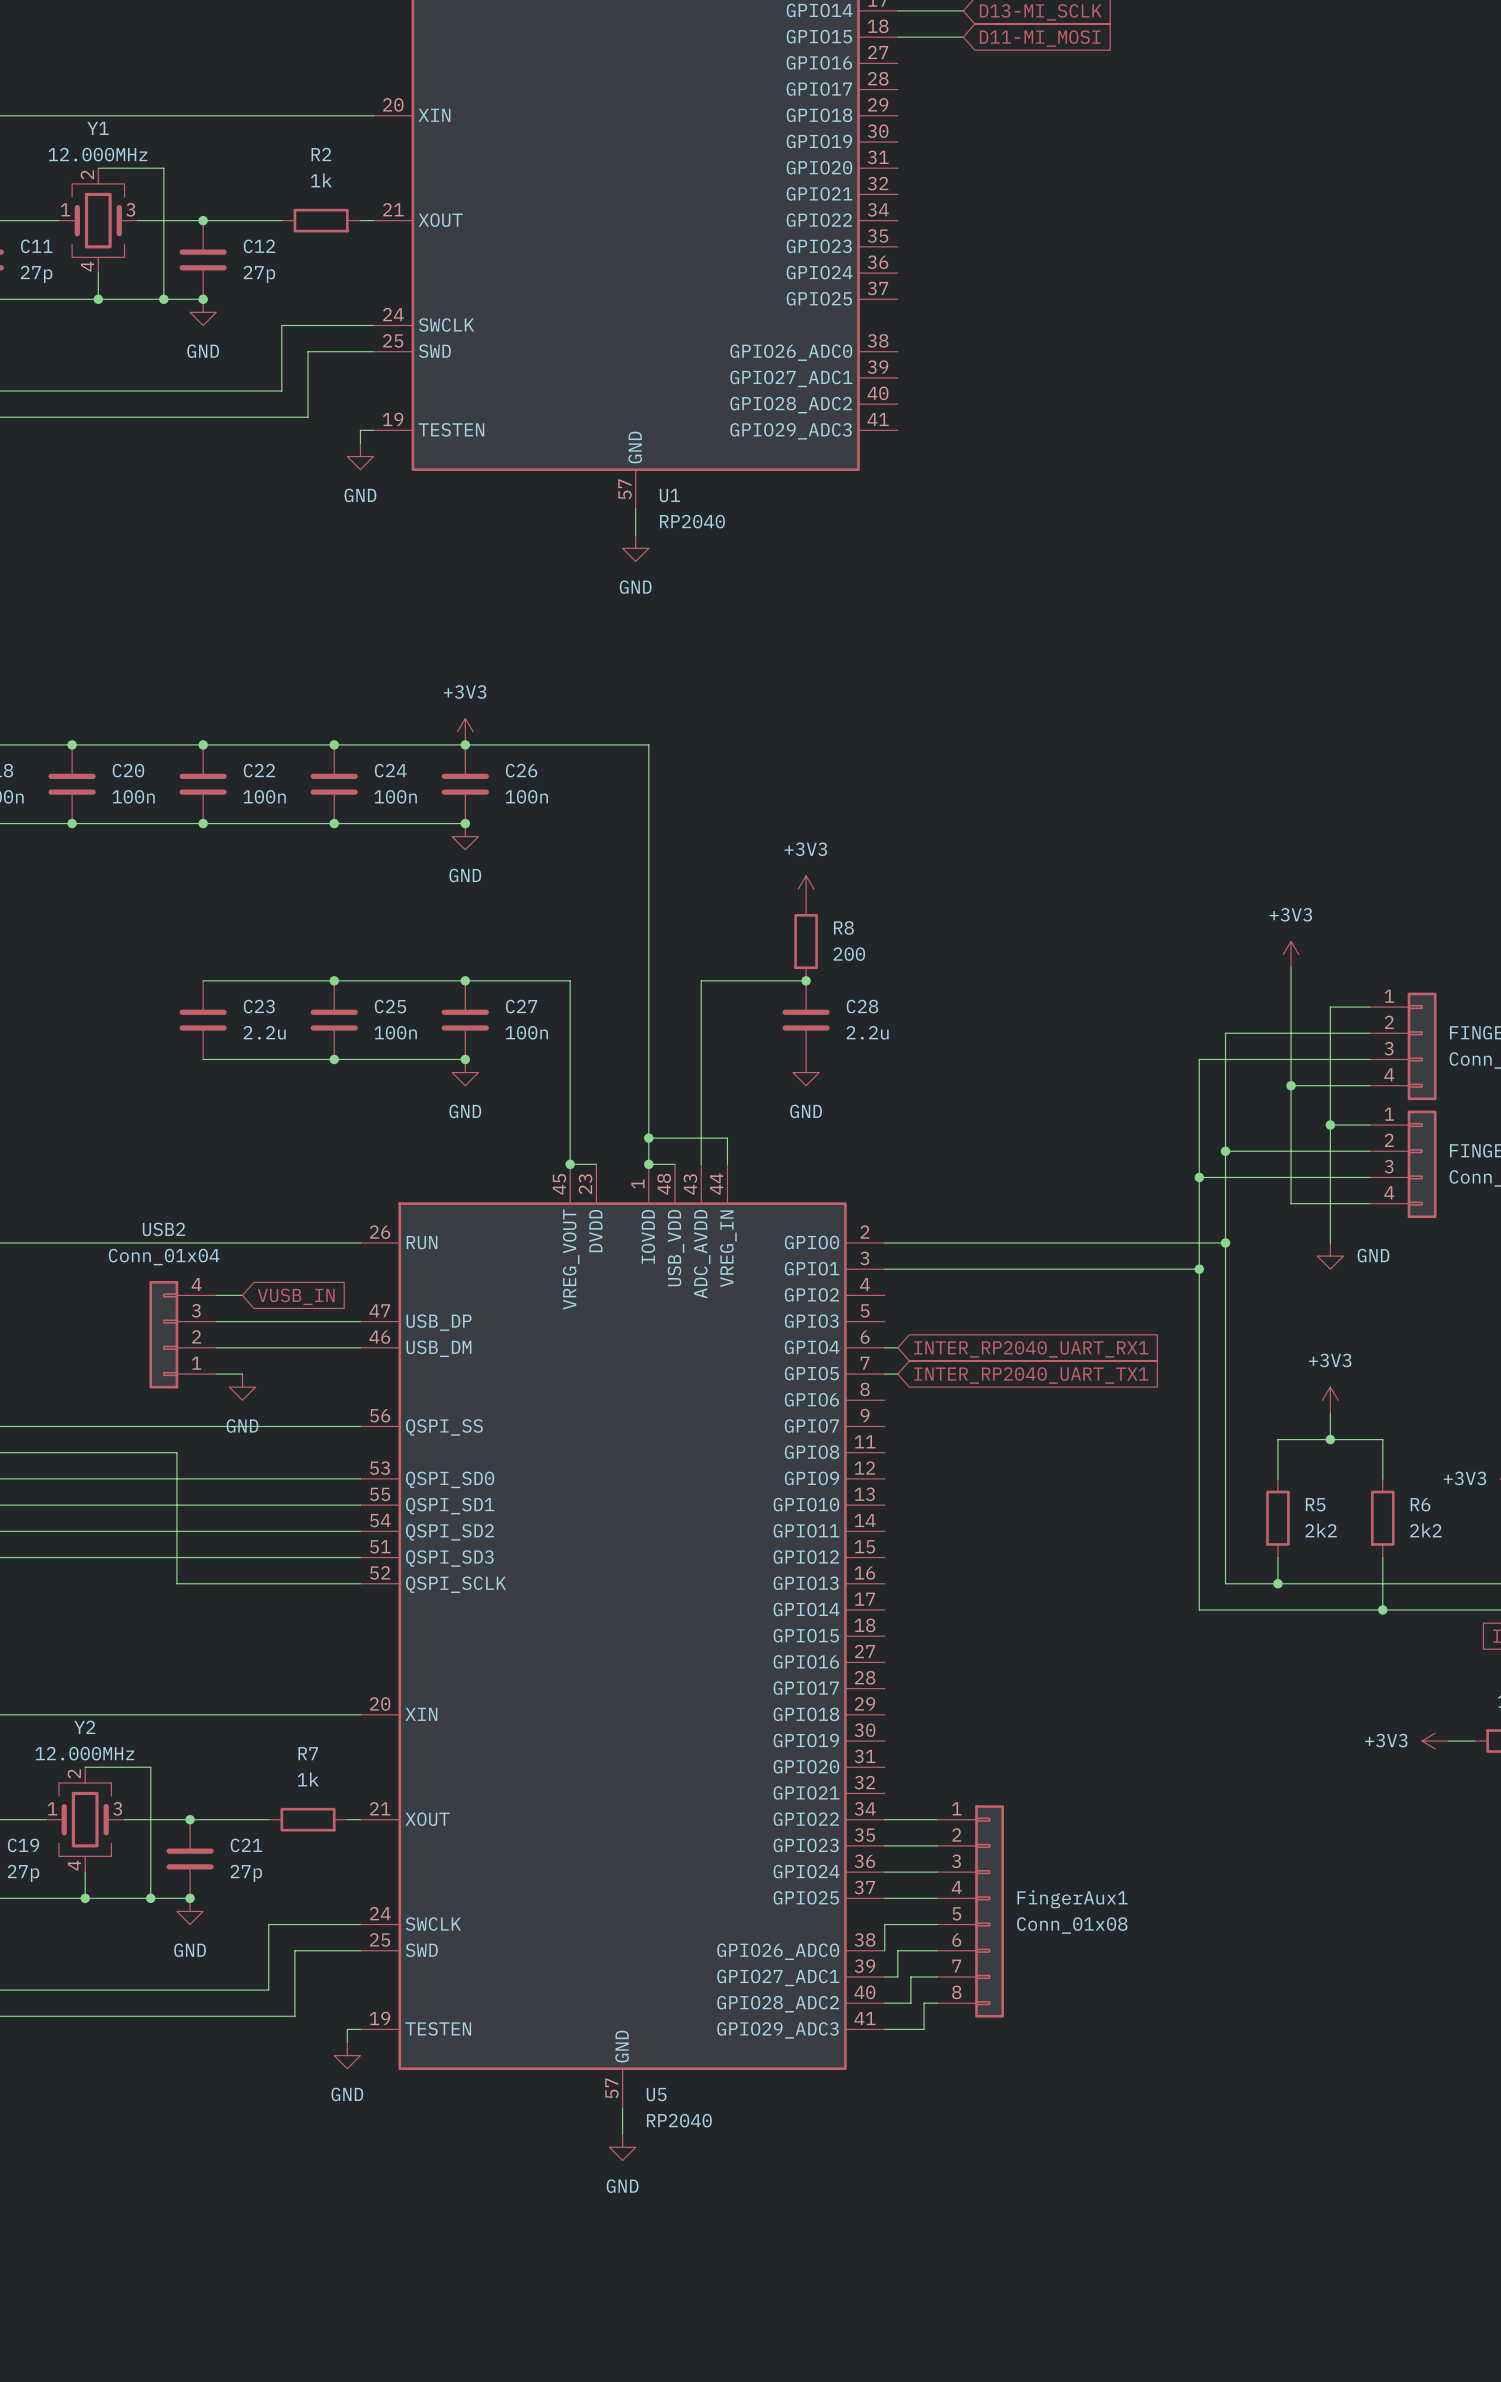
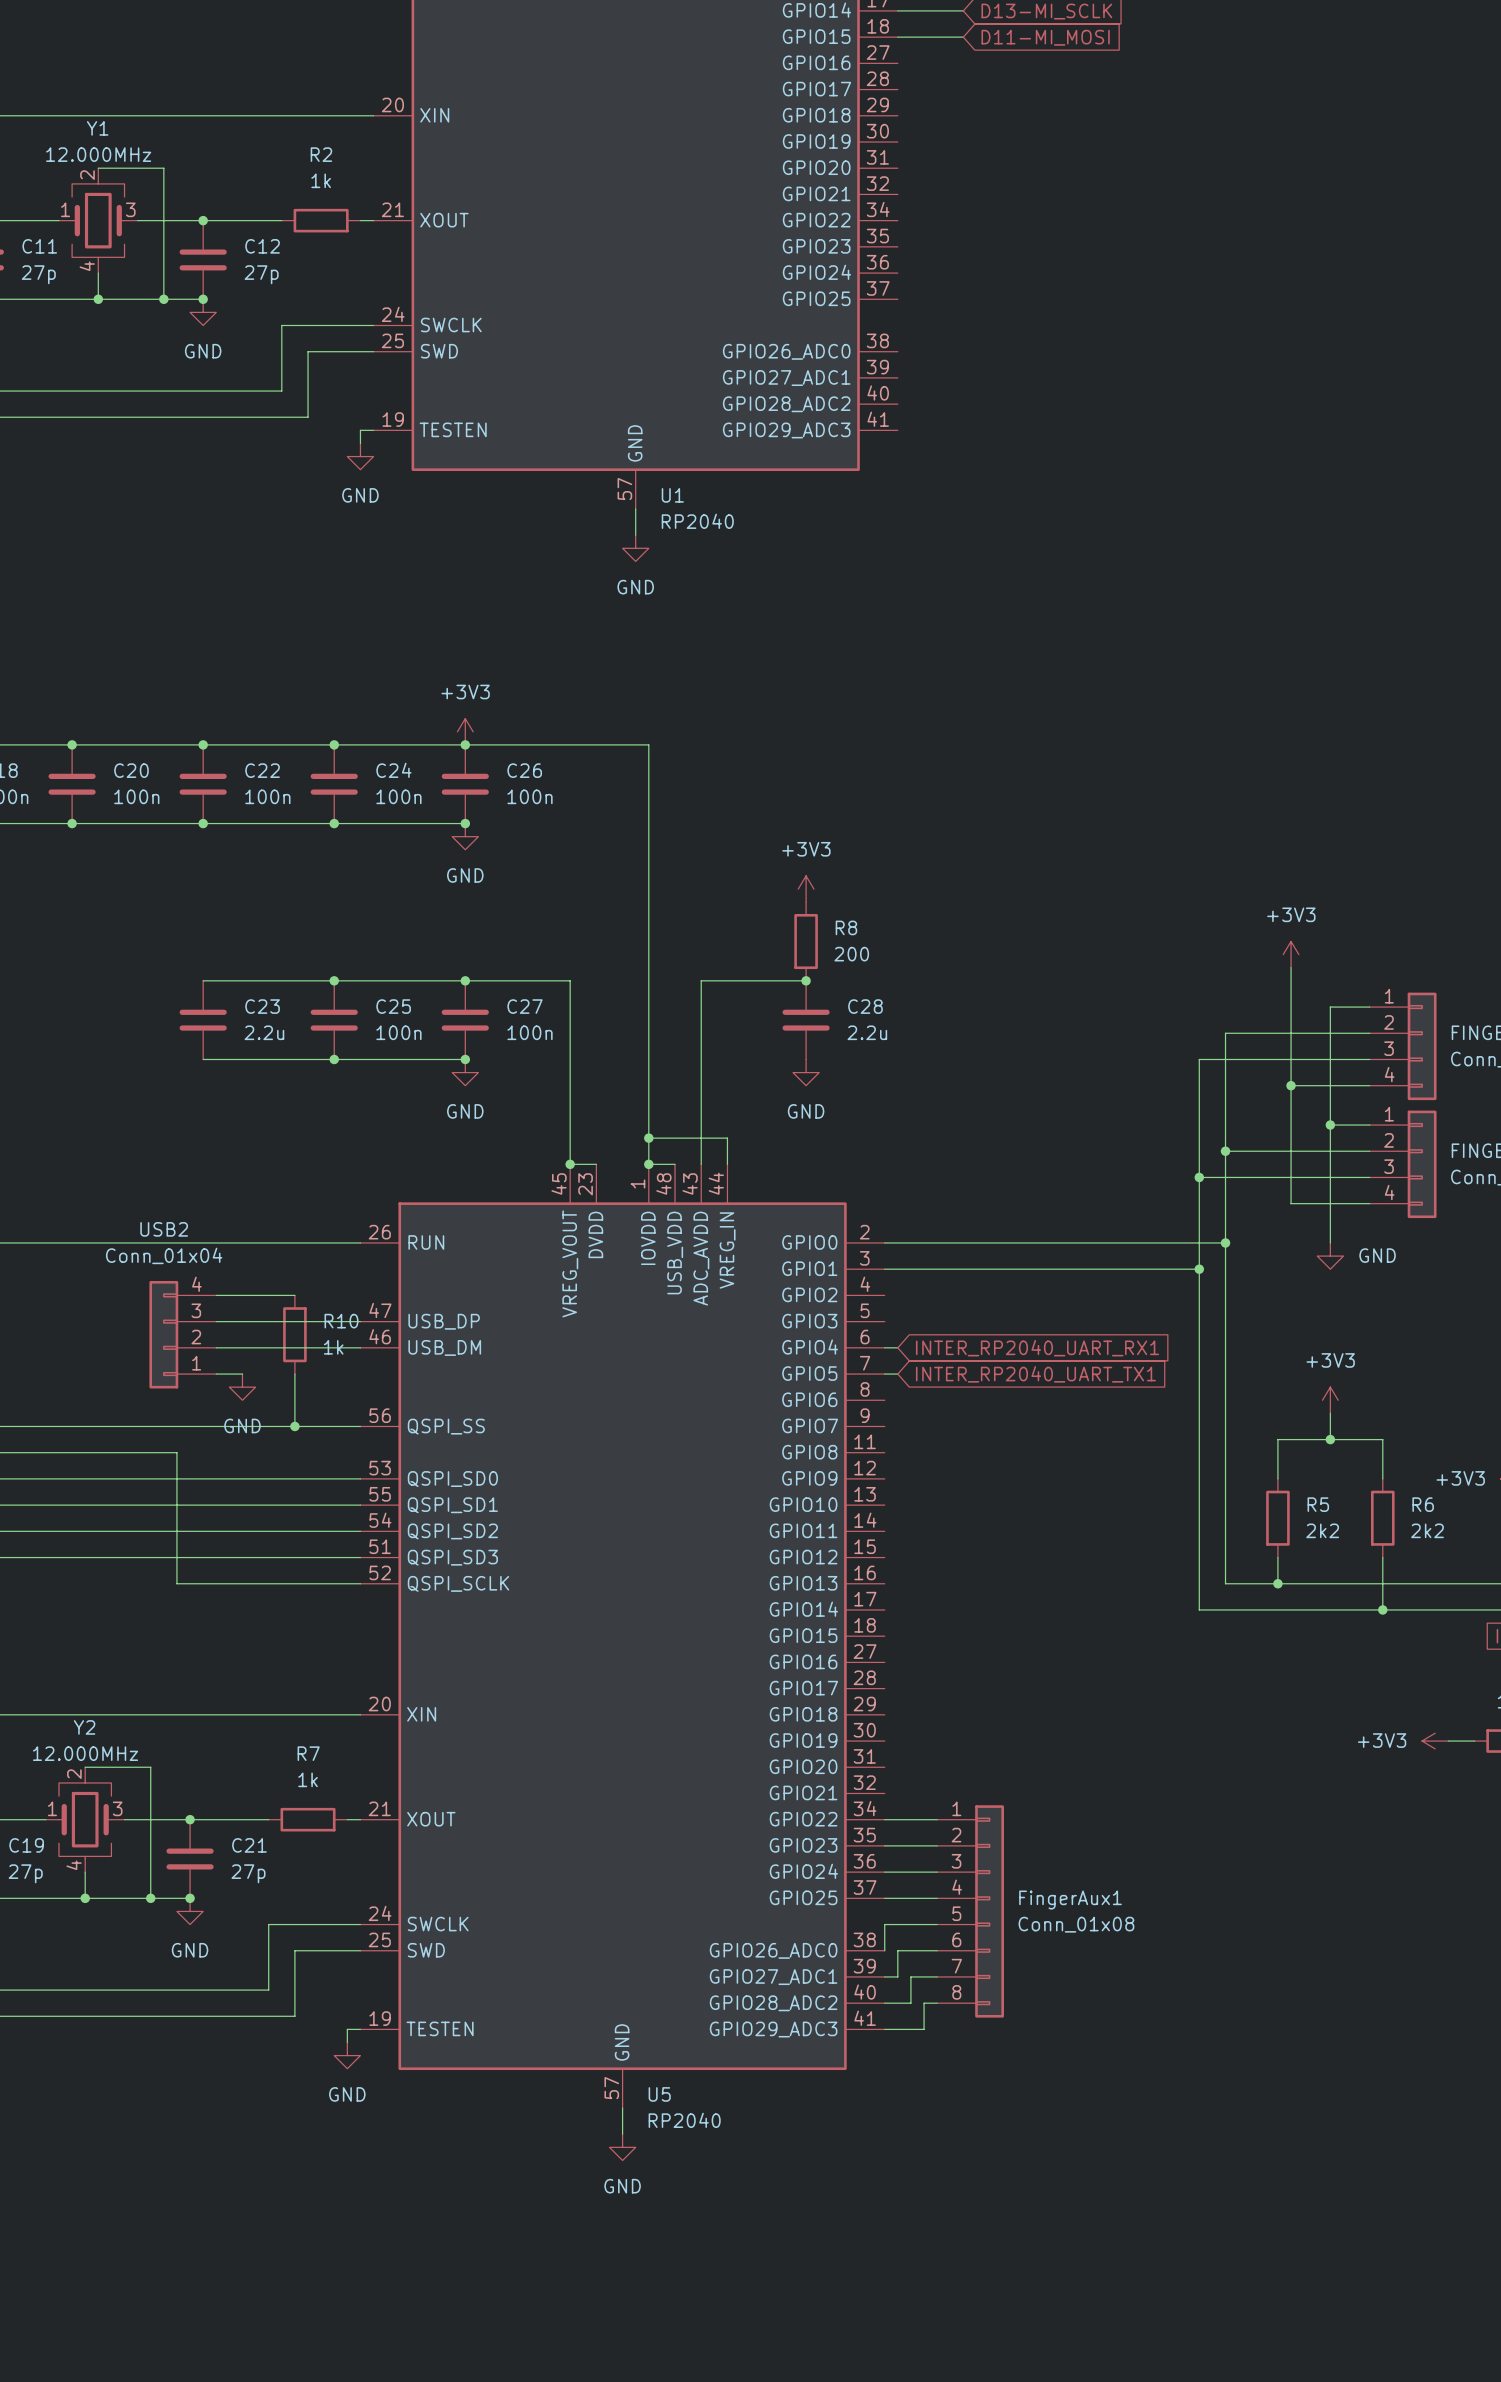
wire: none -> (242, 1295) (294, 1295)
global label: VUSB_IN (296, 1296) -> none
R10: none -> 1k (294, 1334)
wire: none -> (294, 1374) (294, 1426)
junction: none -> (294, 1426)

